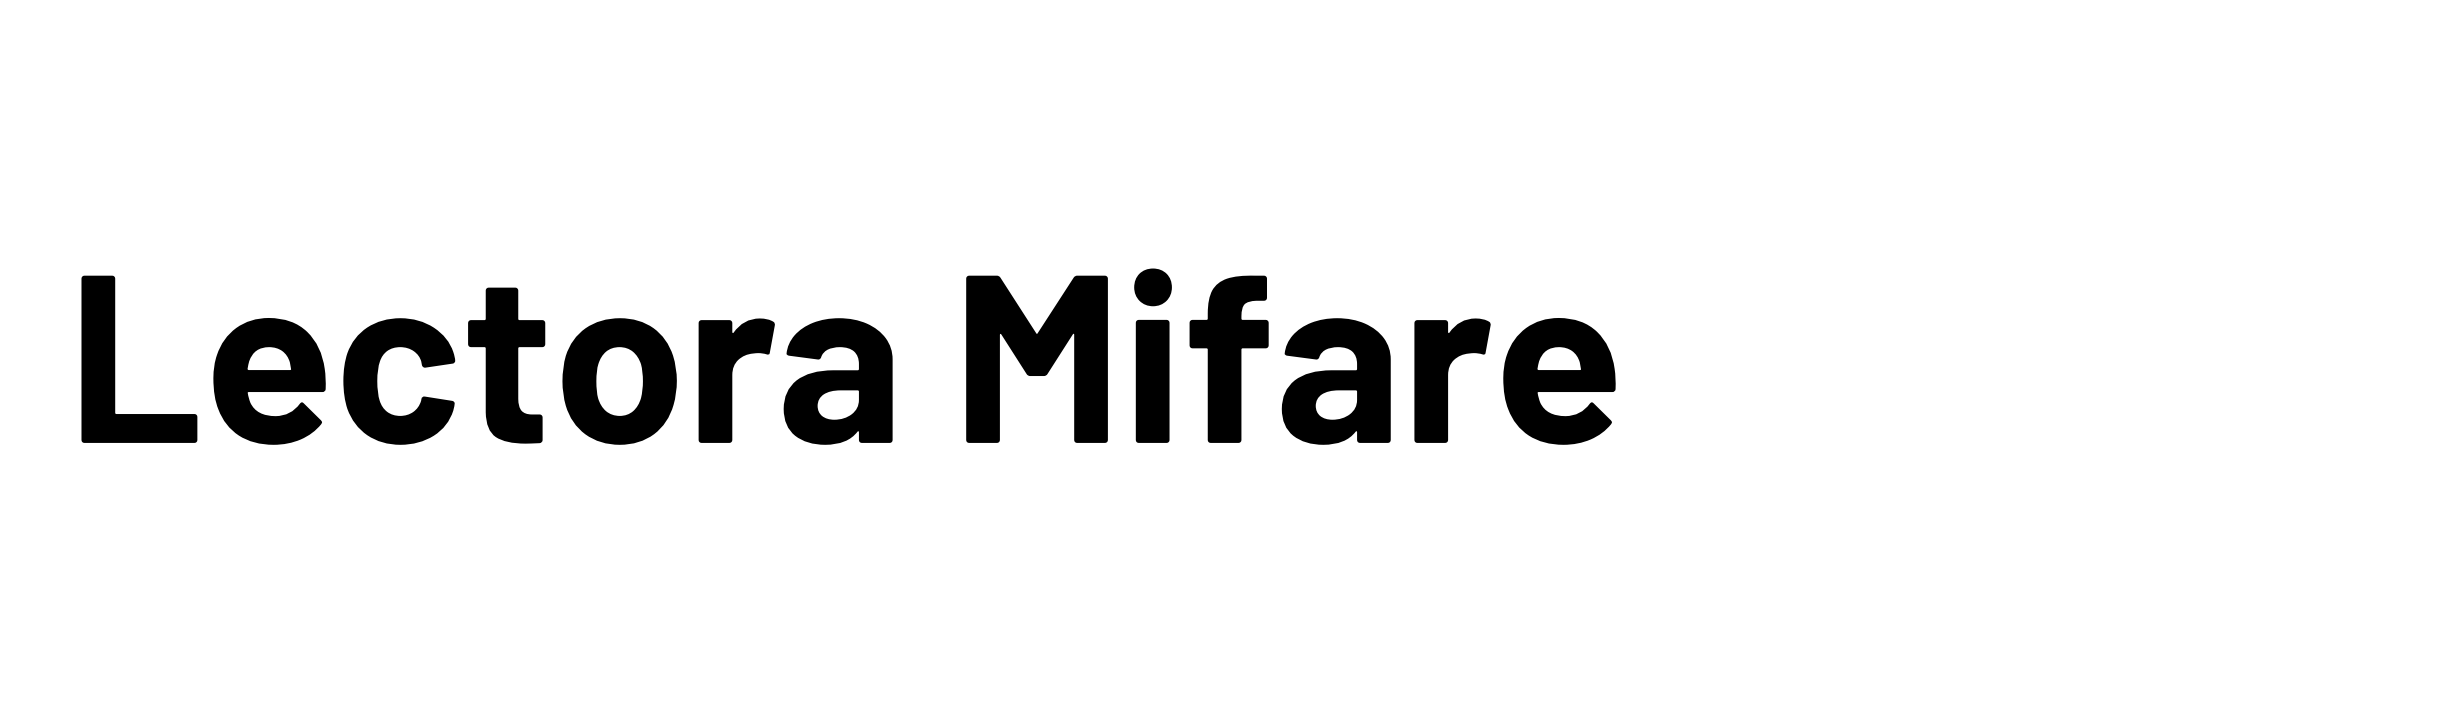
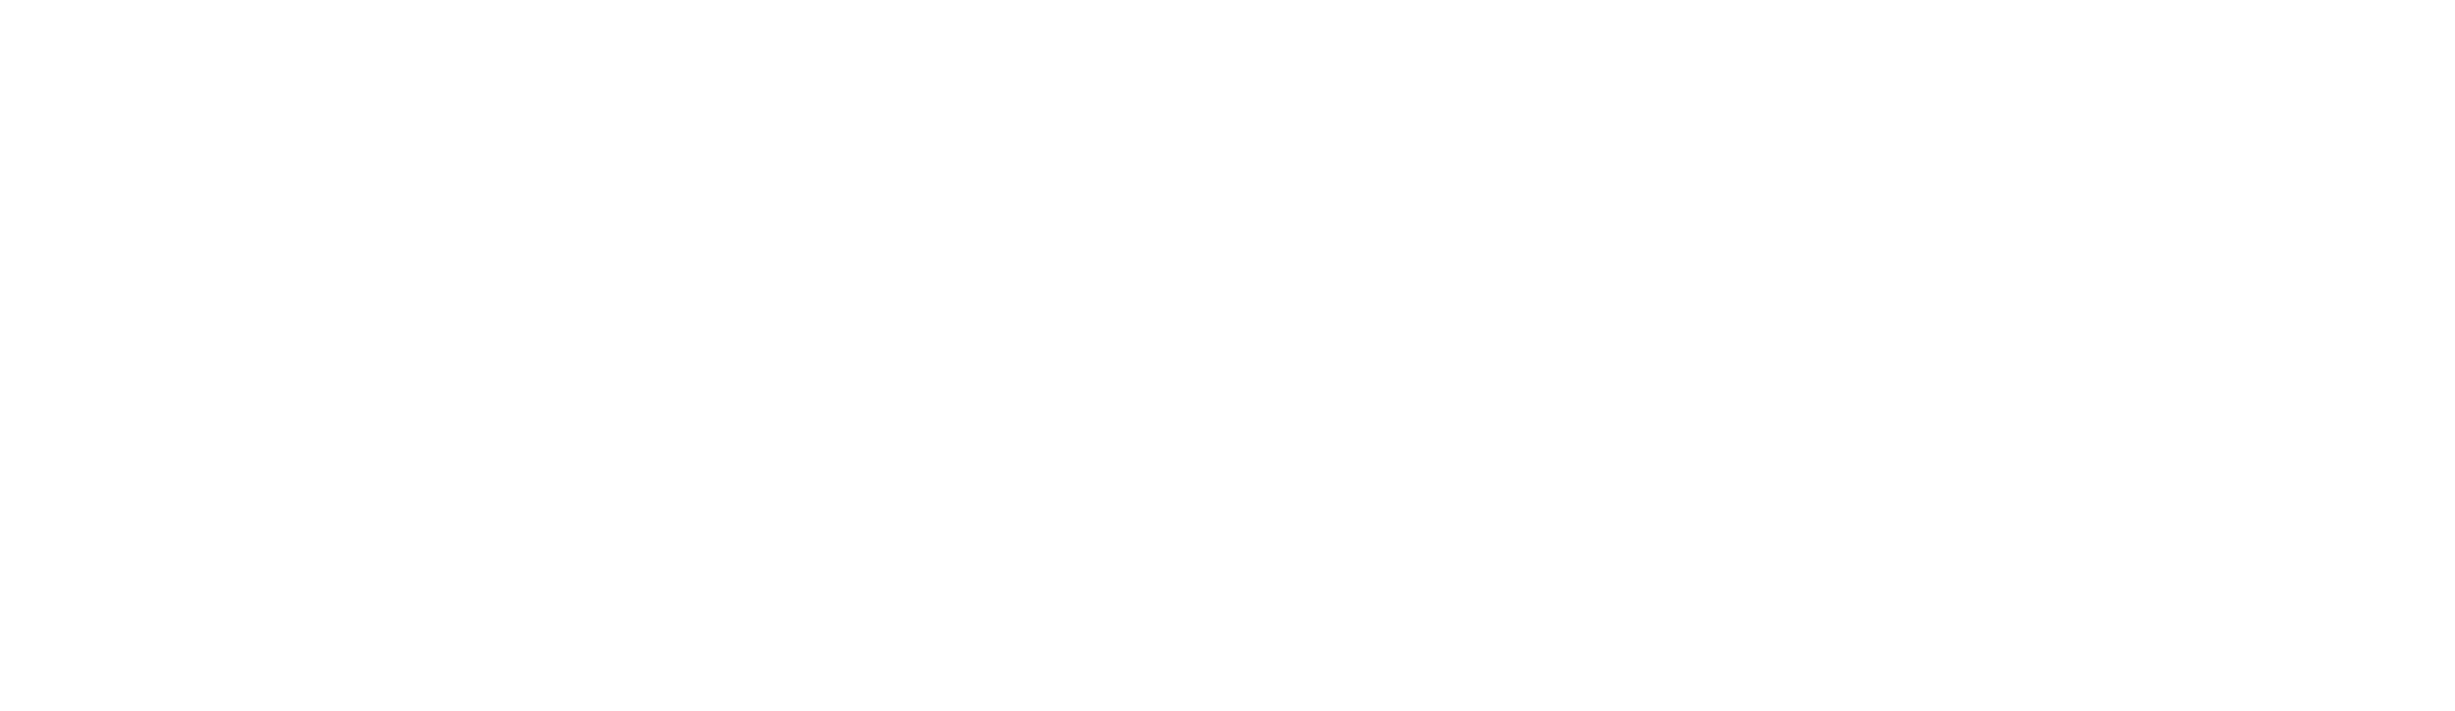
text: Lectora Mifare (848, 356) -> none

